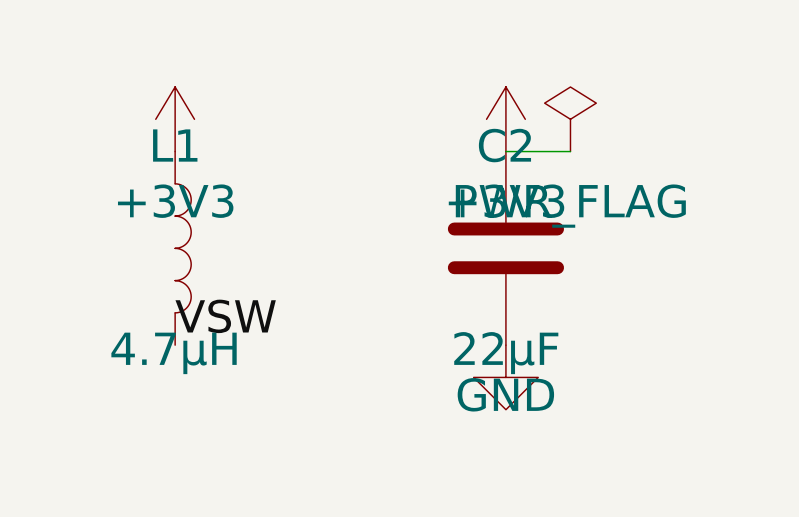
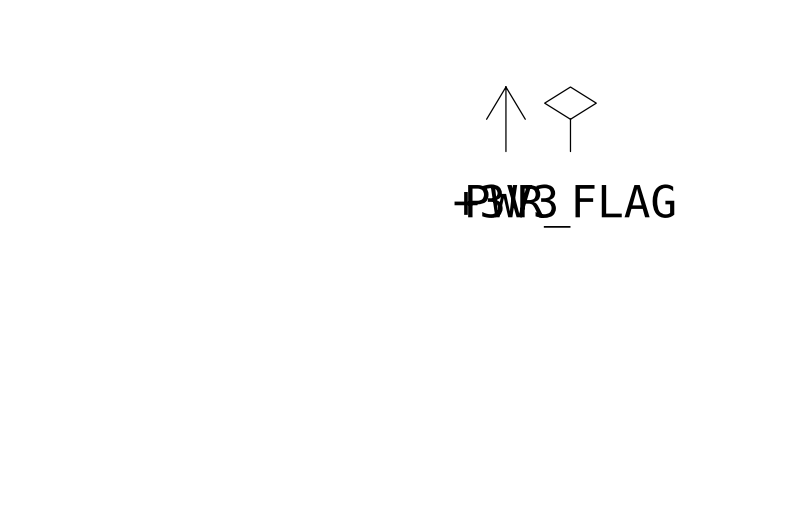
power symbol: +3V3 (175, 119) -> none
wire: (505, 151) (570, 151) -> none
L1: 4.7µH (183, 248) -> none
C2: 22µF (505, 248) -> none
label: VSW (225, 316) -> none
power symbol: GND (505, 377) -> none

